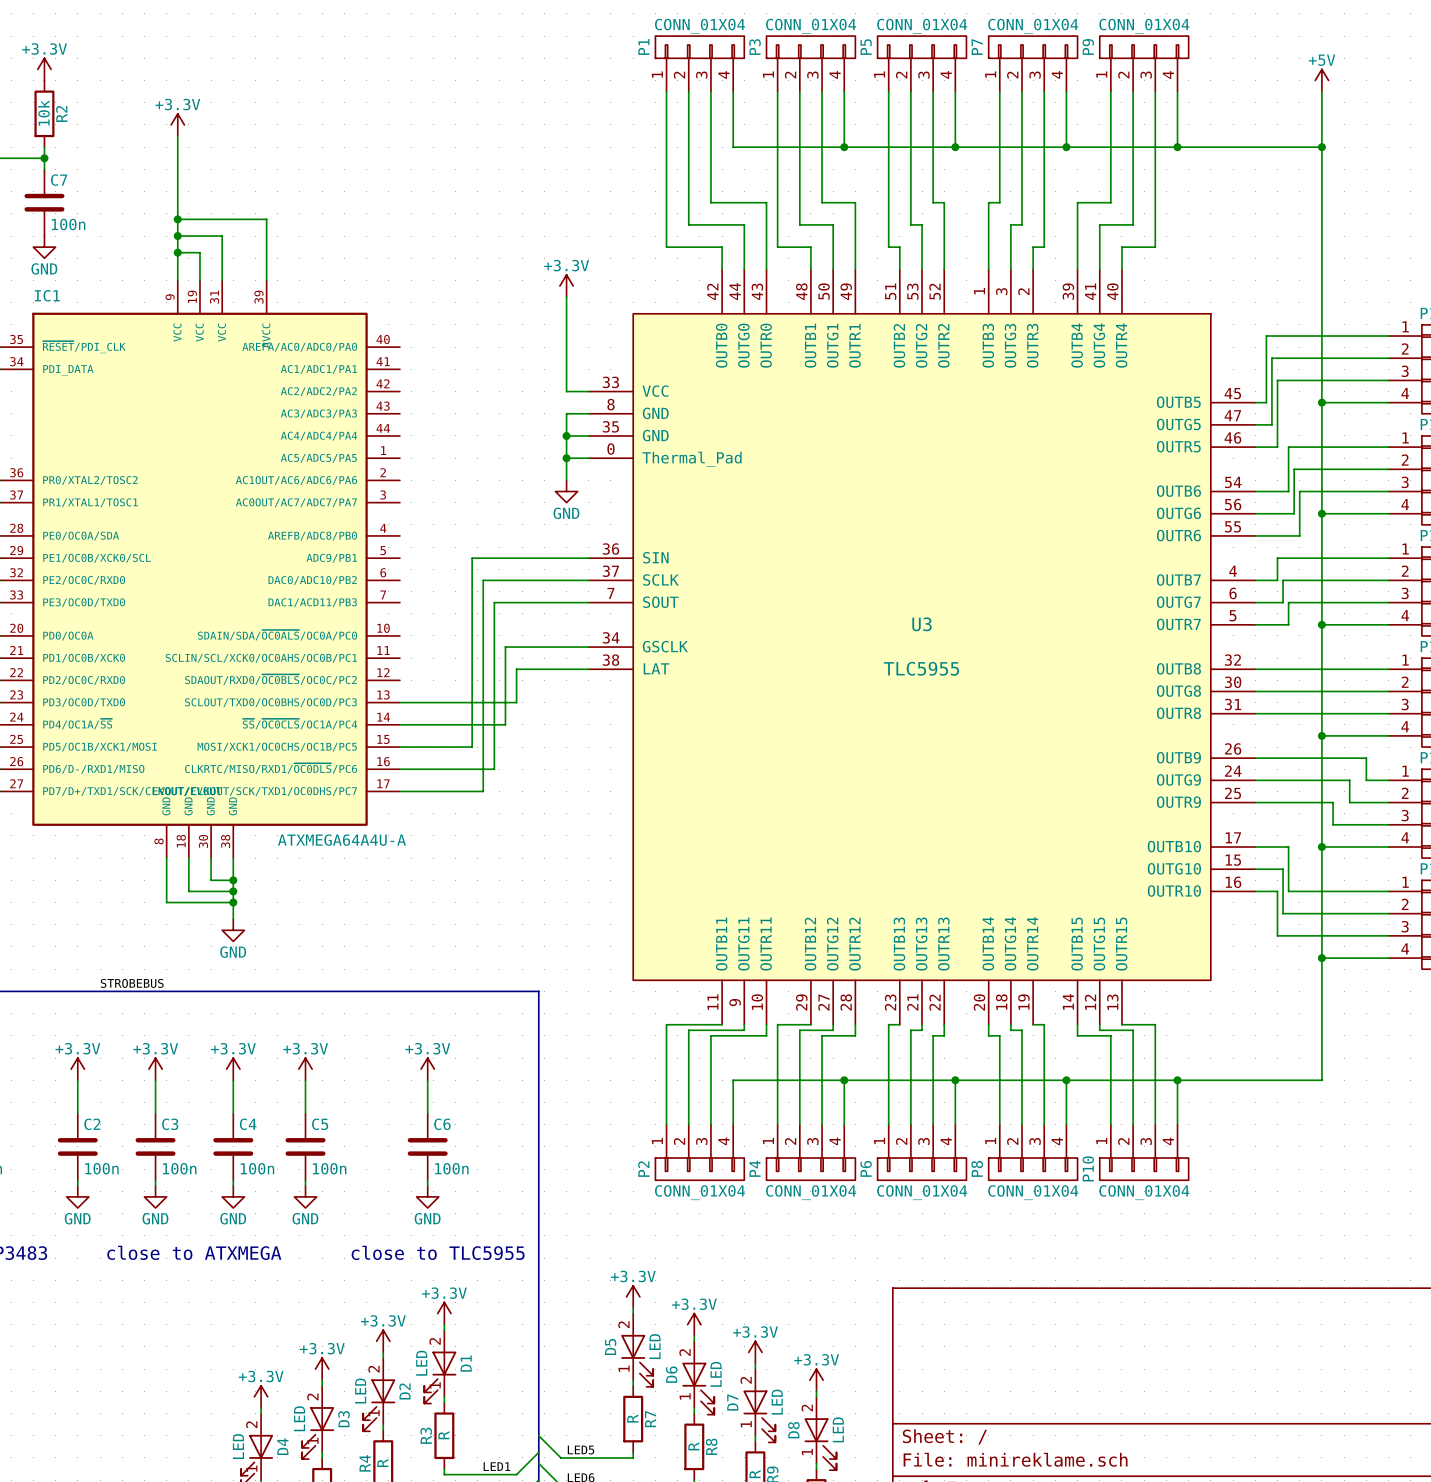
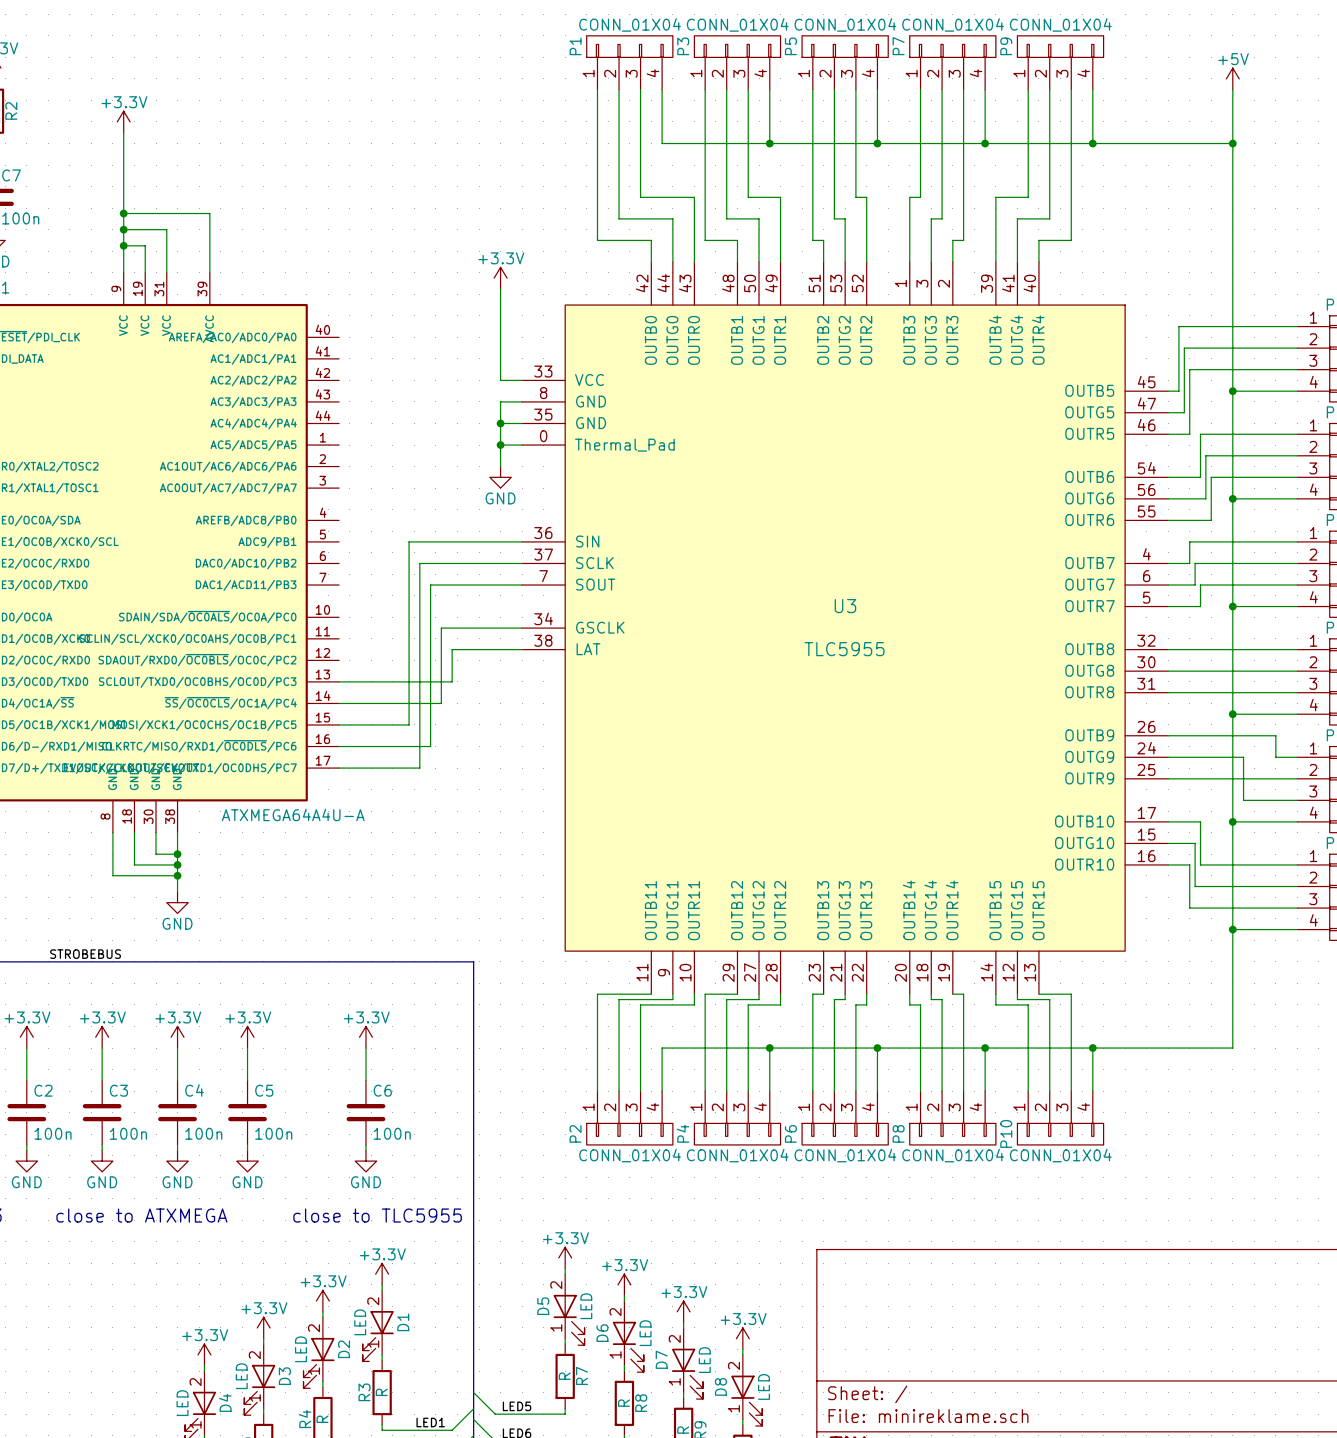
wire: (1333, 780) (1349, 780) (1349, 802) -> (1243, 757) (1243, 778) (1259, 778)

